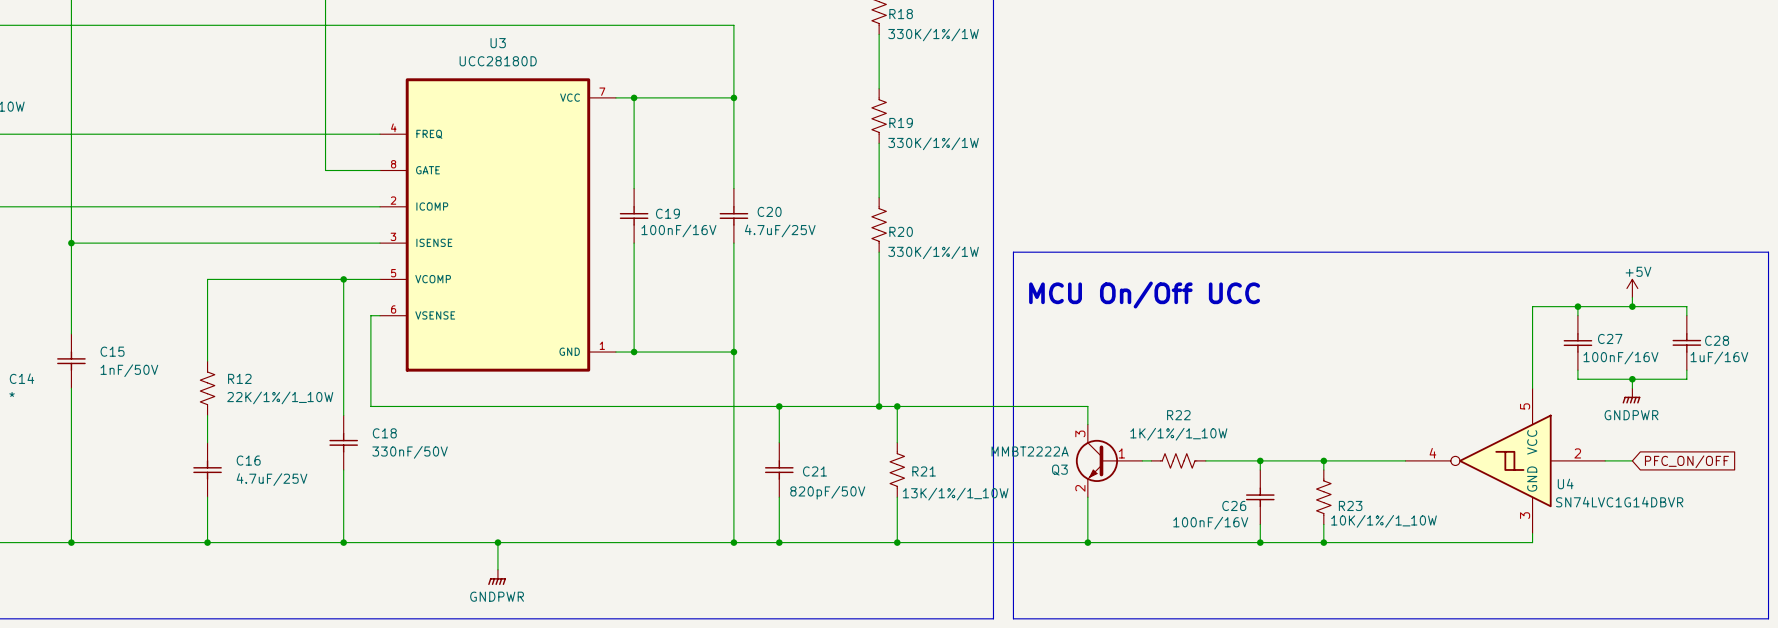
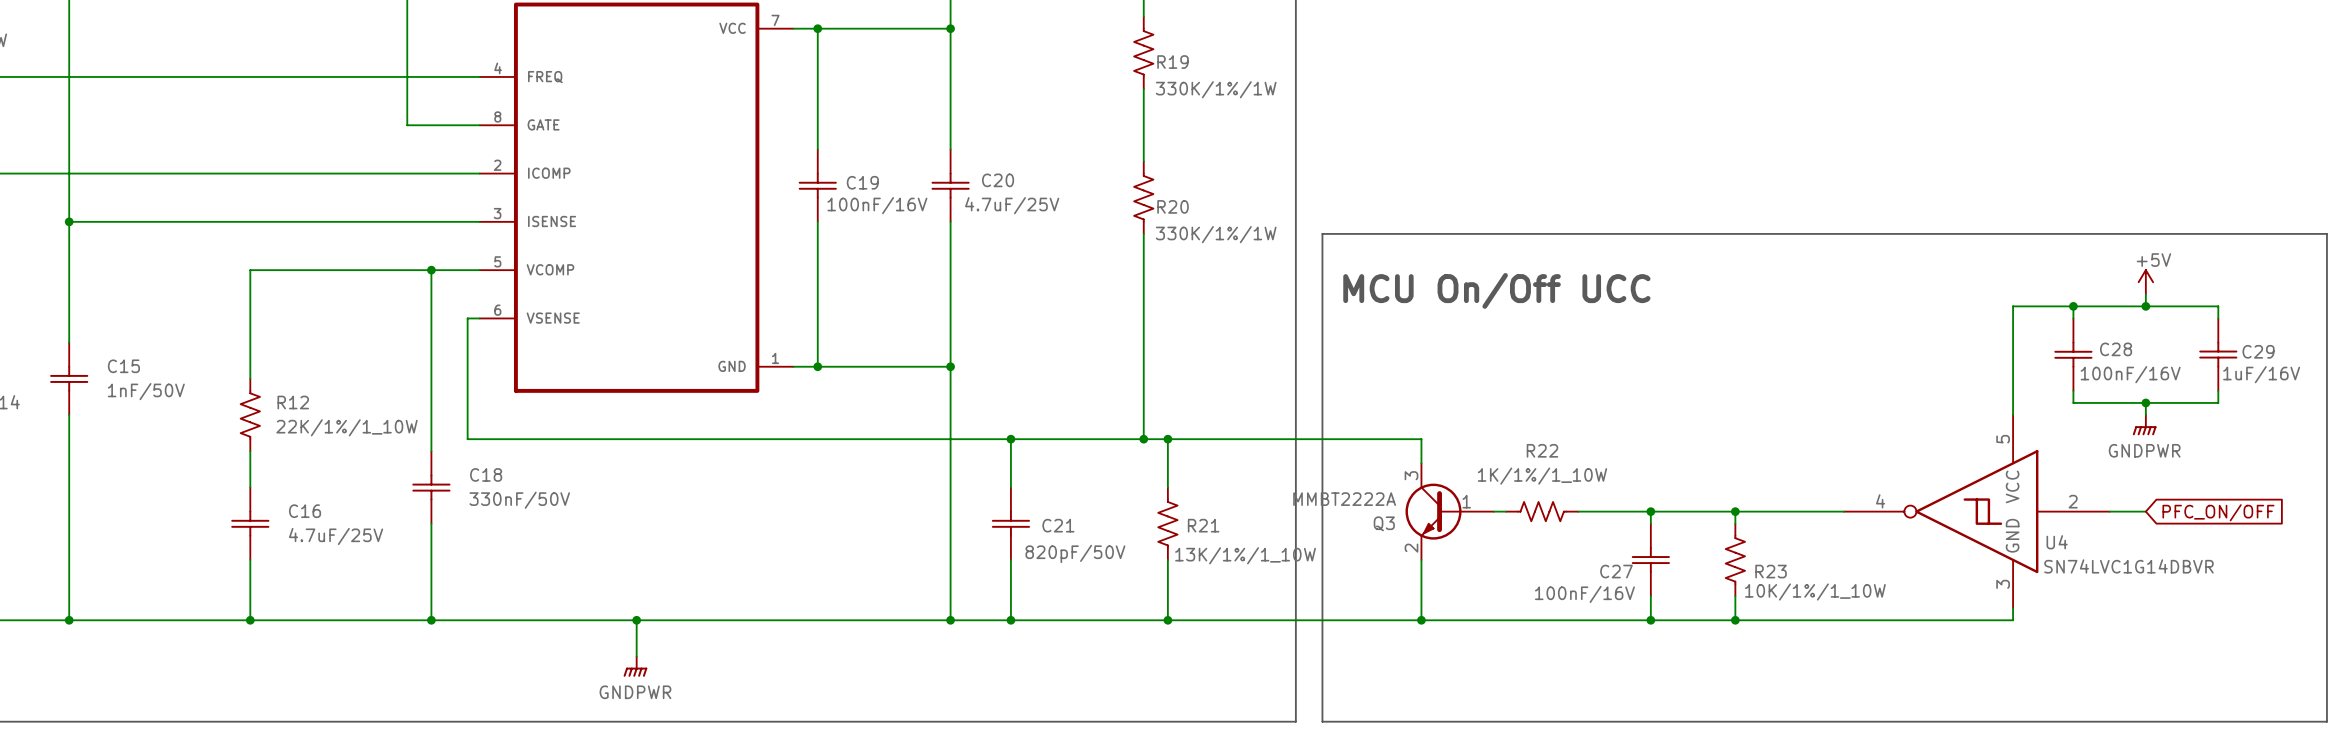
C27 name: C27 (1610, 338) -> C28 (2116, 349)
C28 name: C28 (1717, 340) -> C29 (2258, 351)
C26 name: C26 (1234, 505) -> C27 (1616, 571)

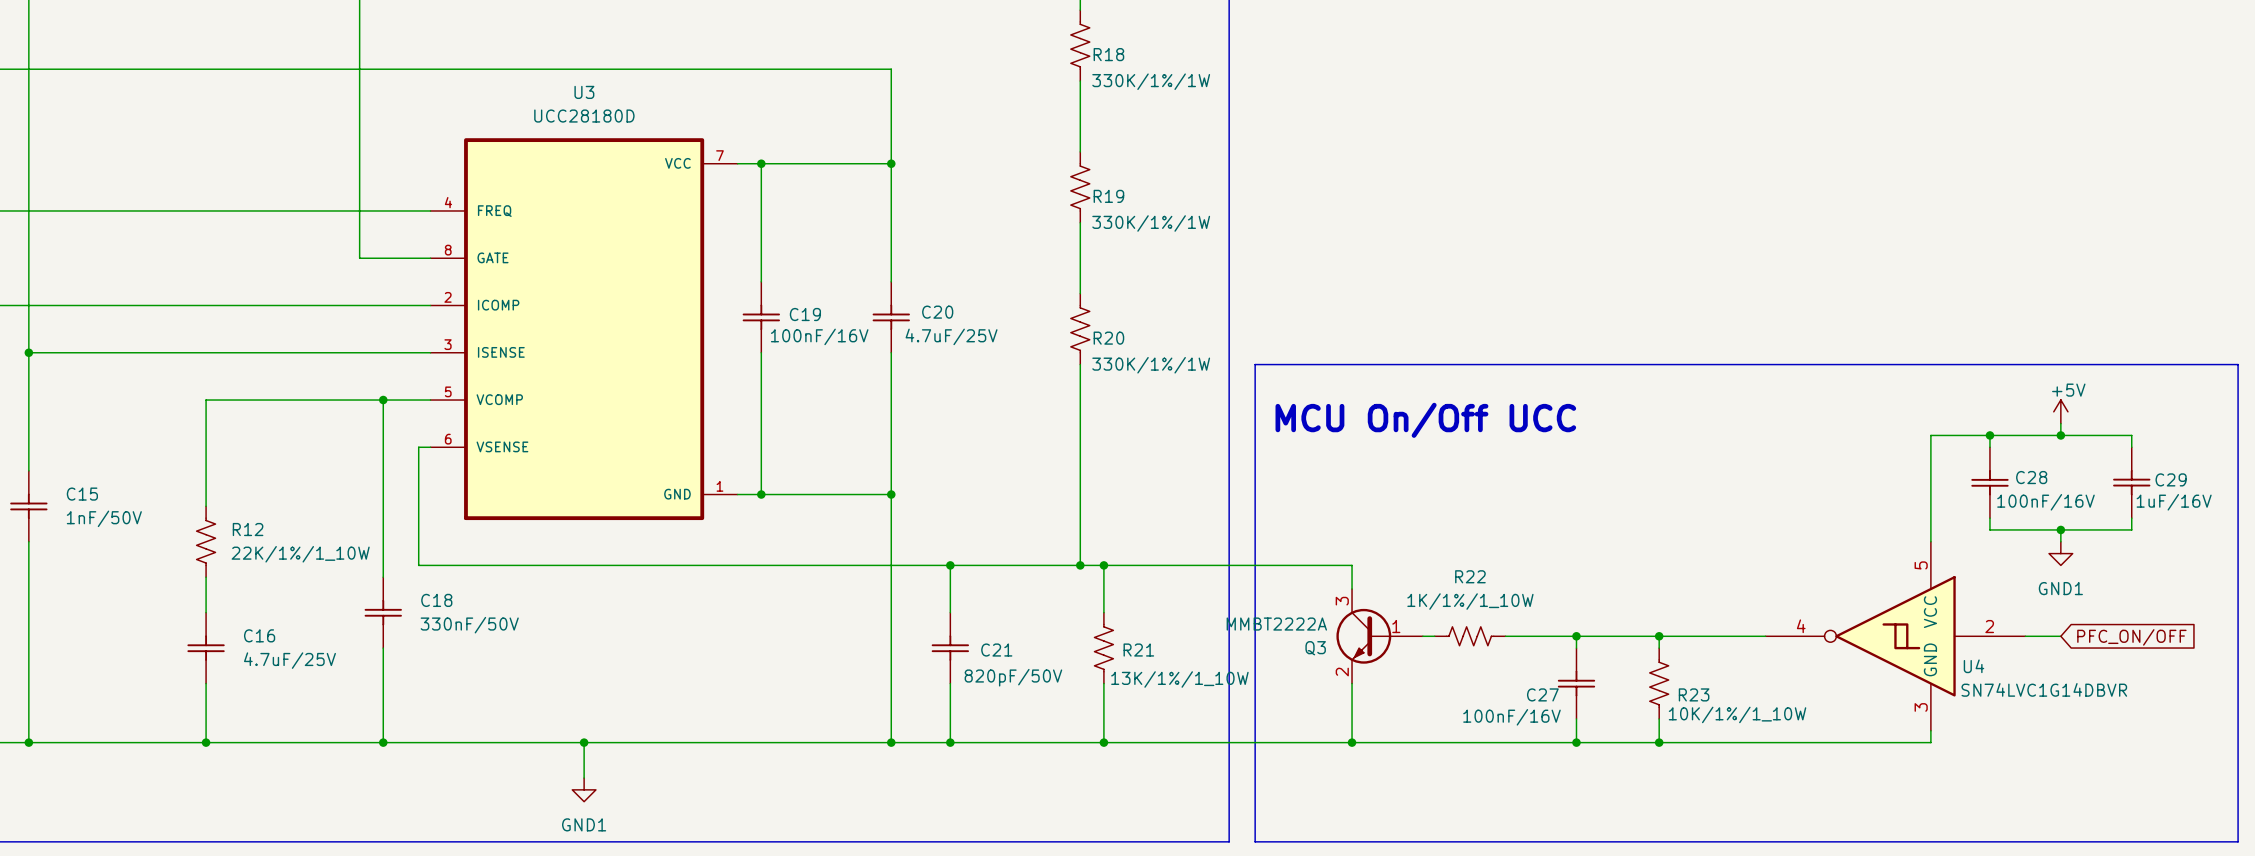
power symbol: GNDPWR (2144, 425) -> GND1 (2060, 553)
power symbol: GNDPWR (635, 666) -> GND1 (584, 789)

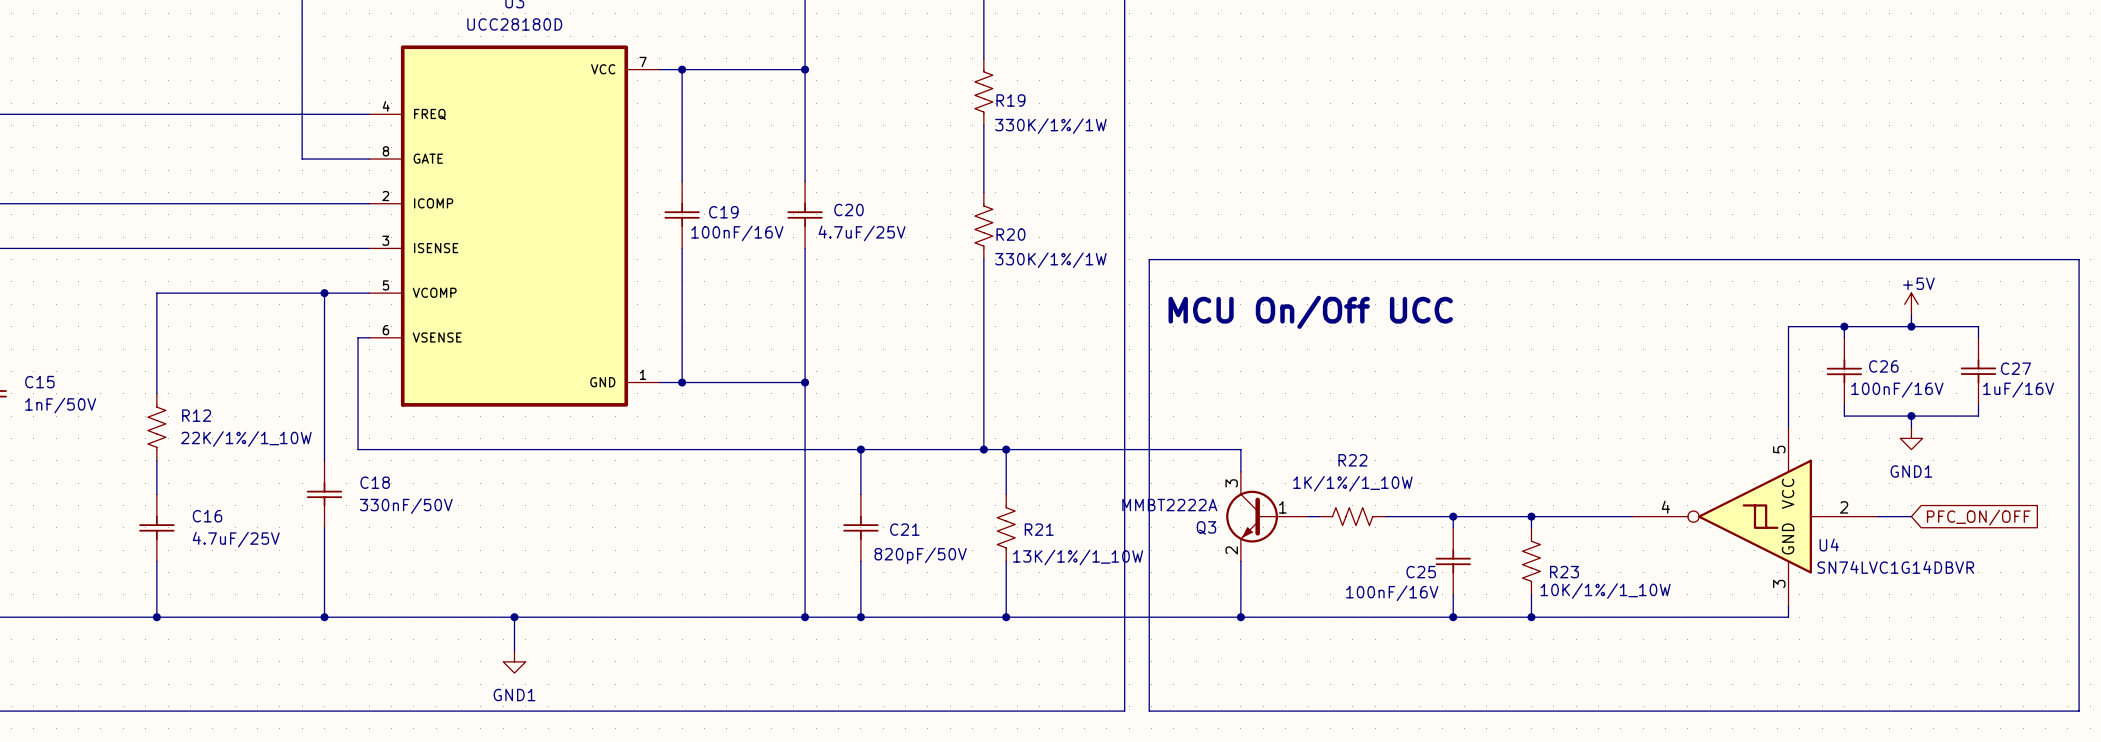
C28 name: C28 (2031, 477) -> C26 (1883, 366)
C29 name: C29 (2171, 479) -> C27 (2015, 368)
C27 name: C27 (1542, 694) -> C25 (1421, 572)

